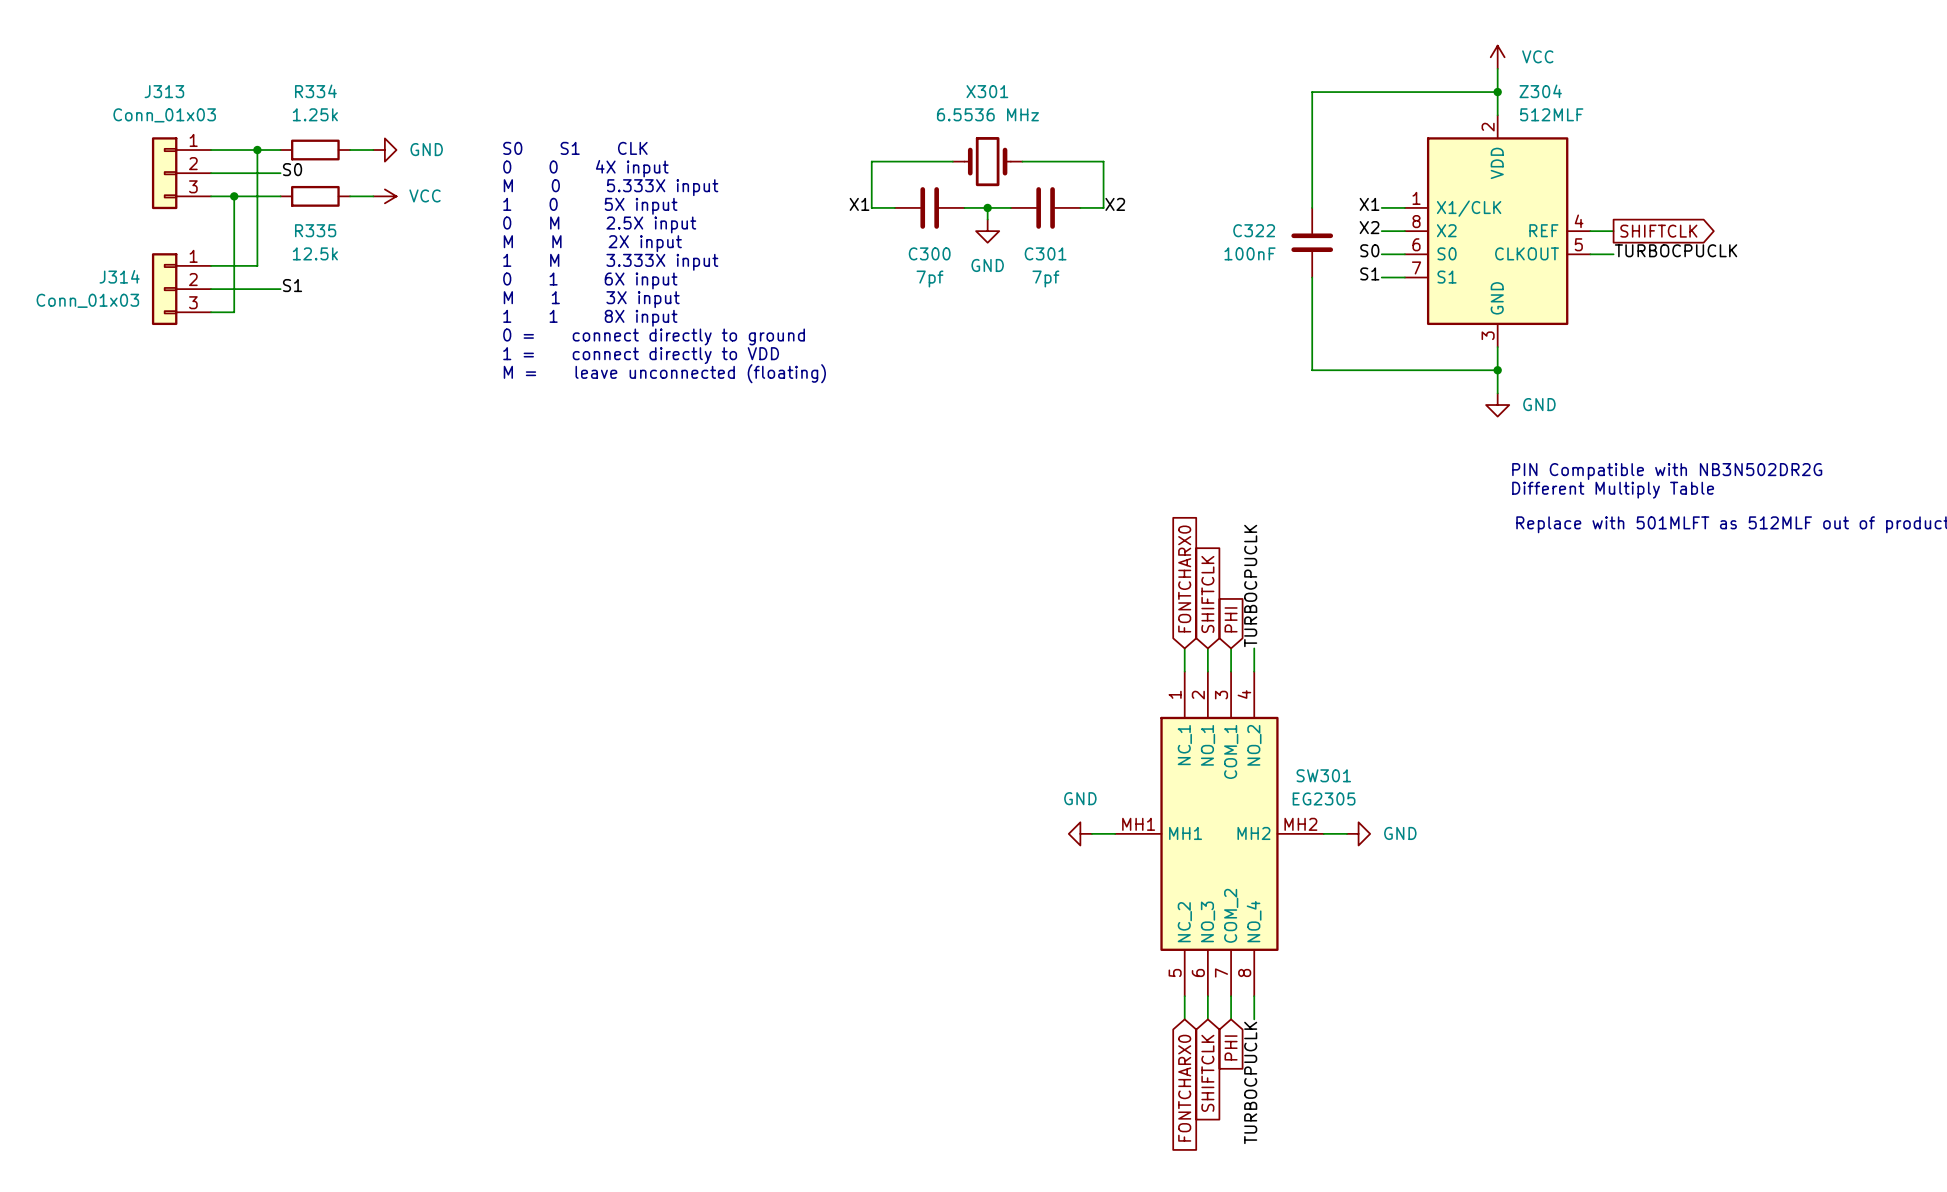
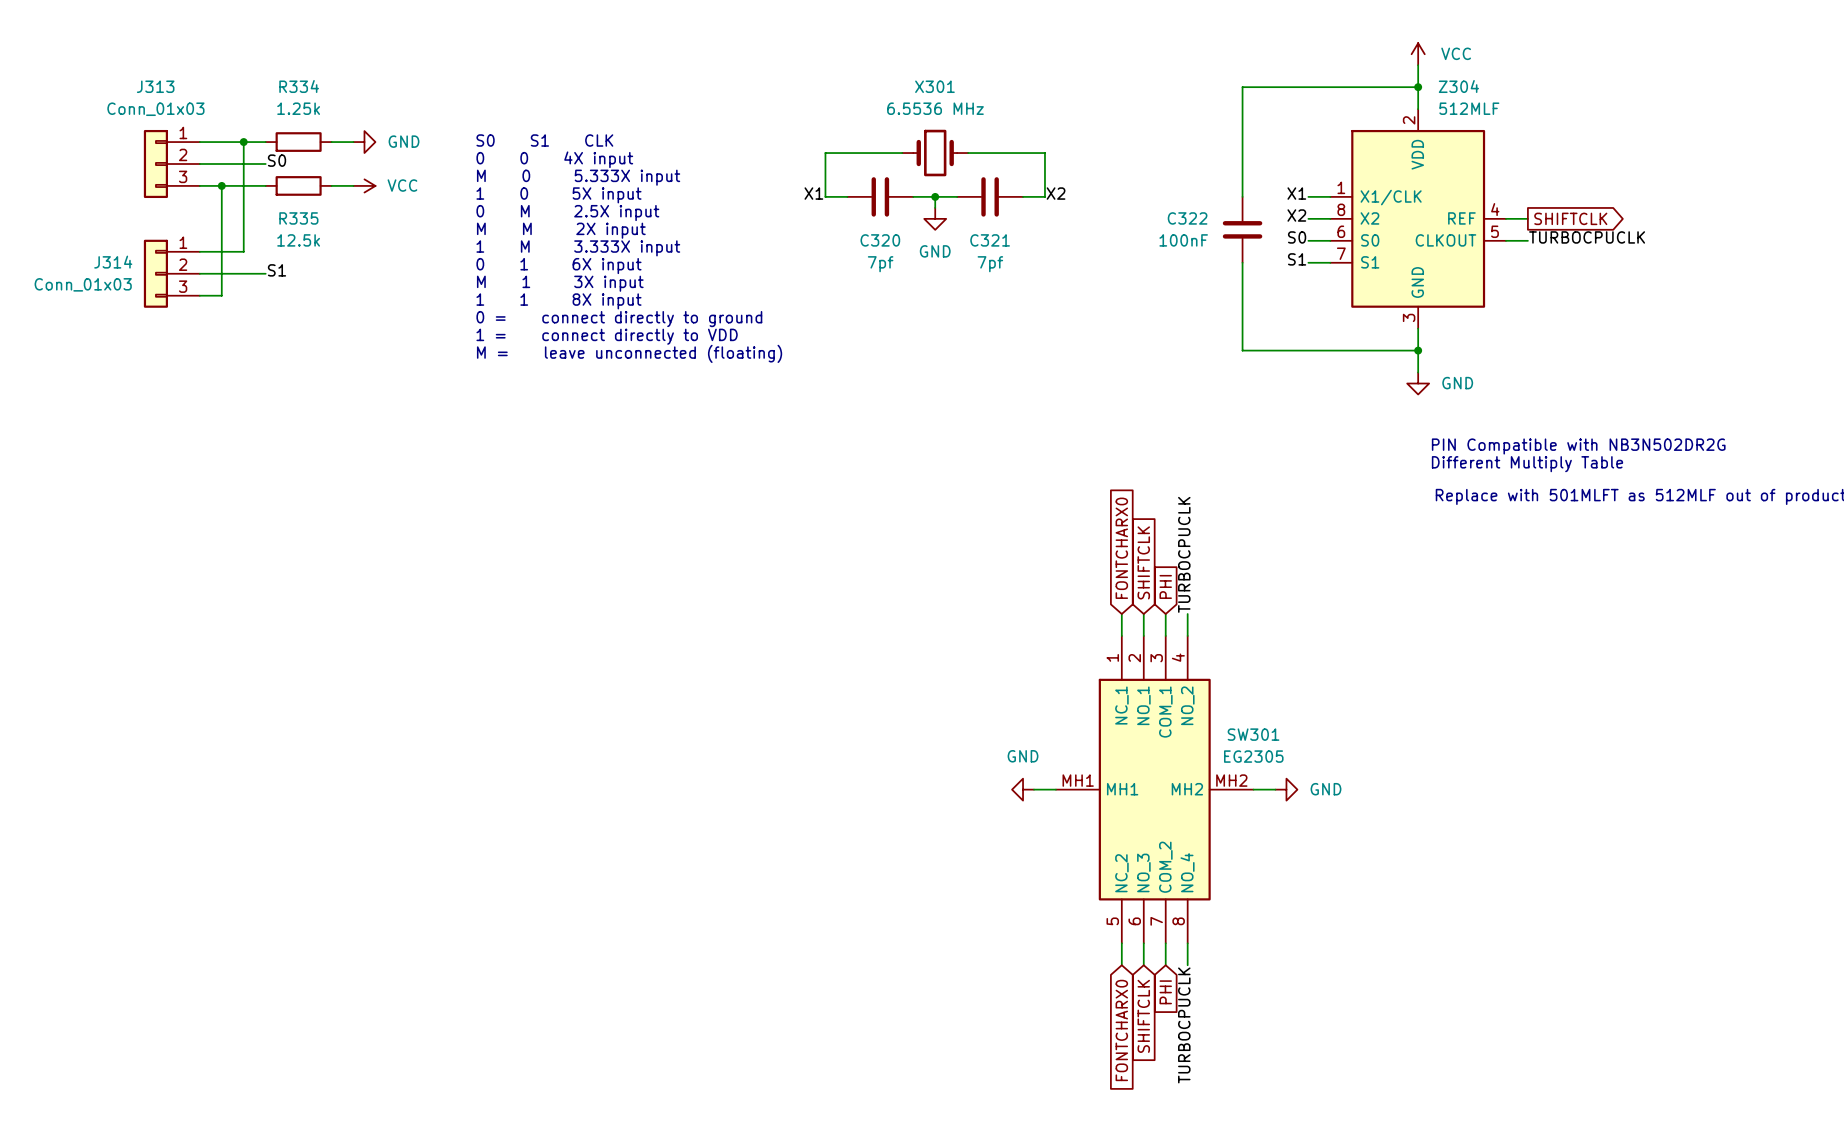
C300 name: C300 (929, 253) -> C320 (880, 240)
C301 name: C301 (1045, 253) -> C321 (990, 240)

